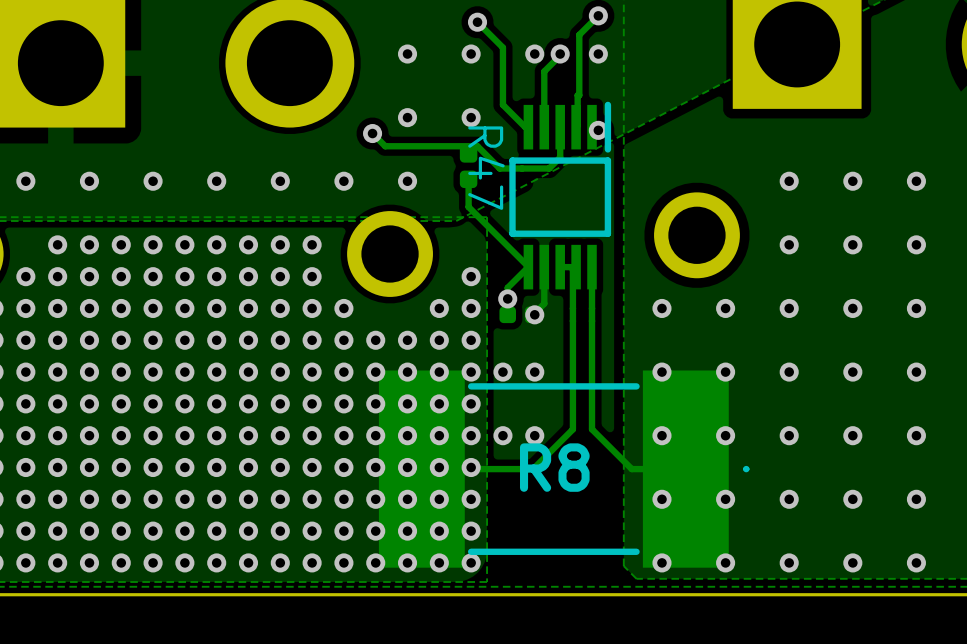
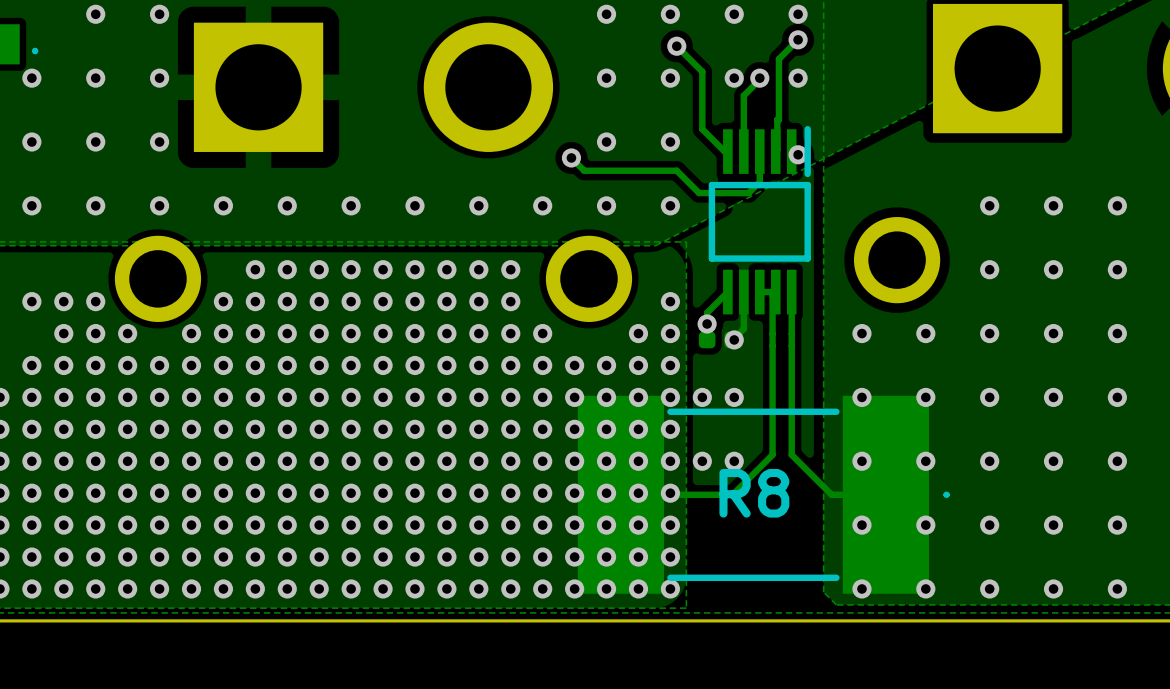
R47: (468, 166) -> none
track: (468, 179) (468, 207) (528, 266) -> none
via: none -> (670, 205)

